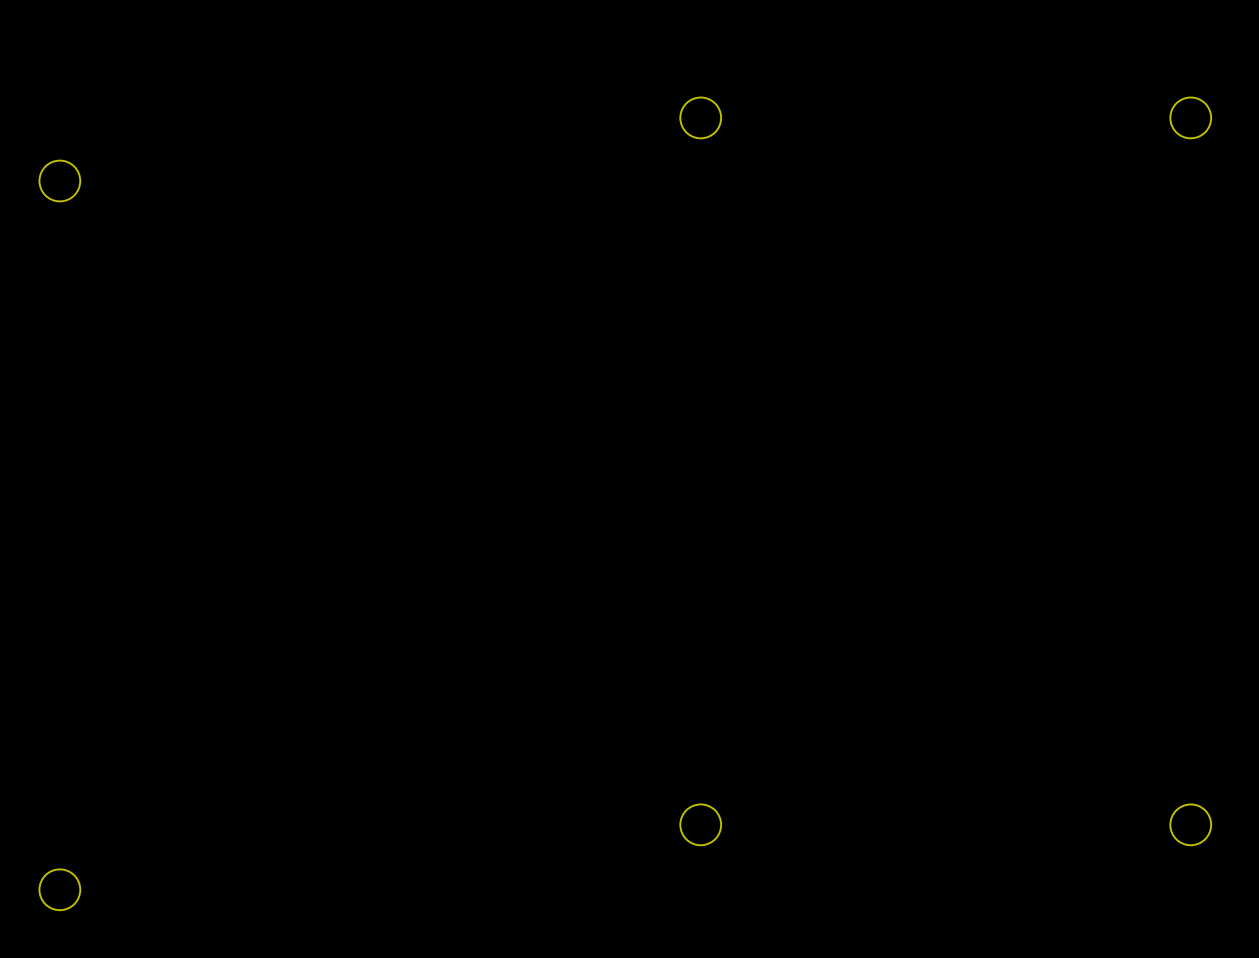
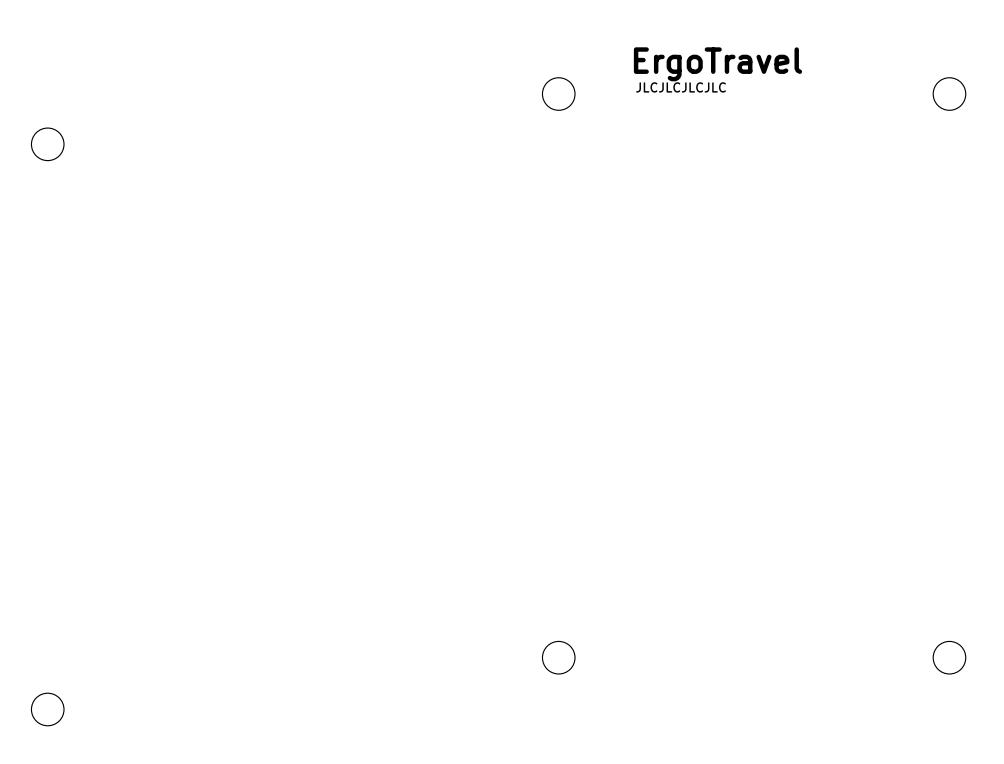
text: none -> ErgoTravel (717, 64)
text: none -> JLCJLCJLCJLC (681, 87)

